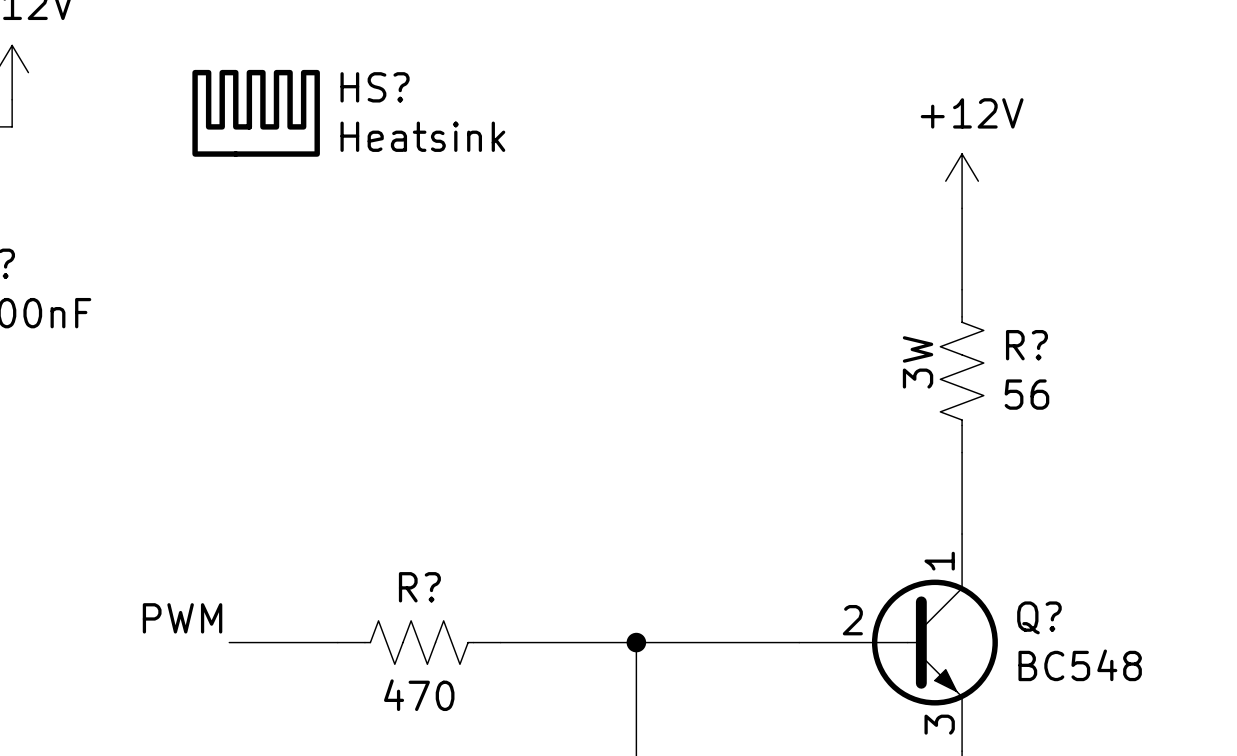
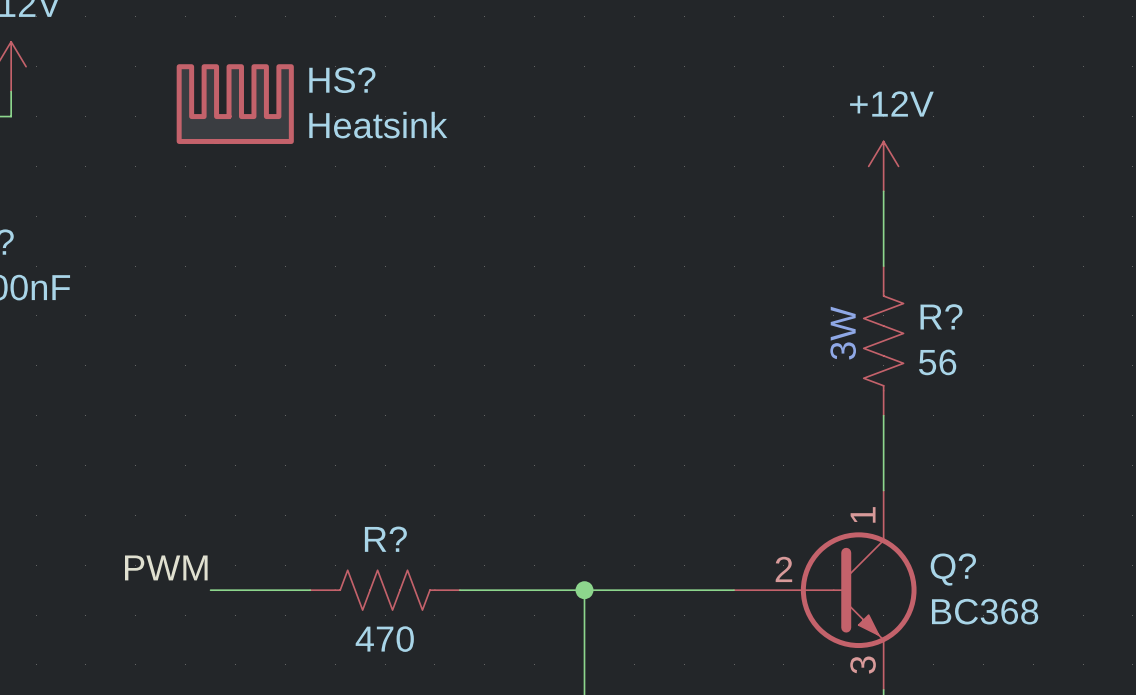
Q? value: BC548 (1080, 665) -> BC368 (985, 611)

